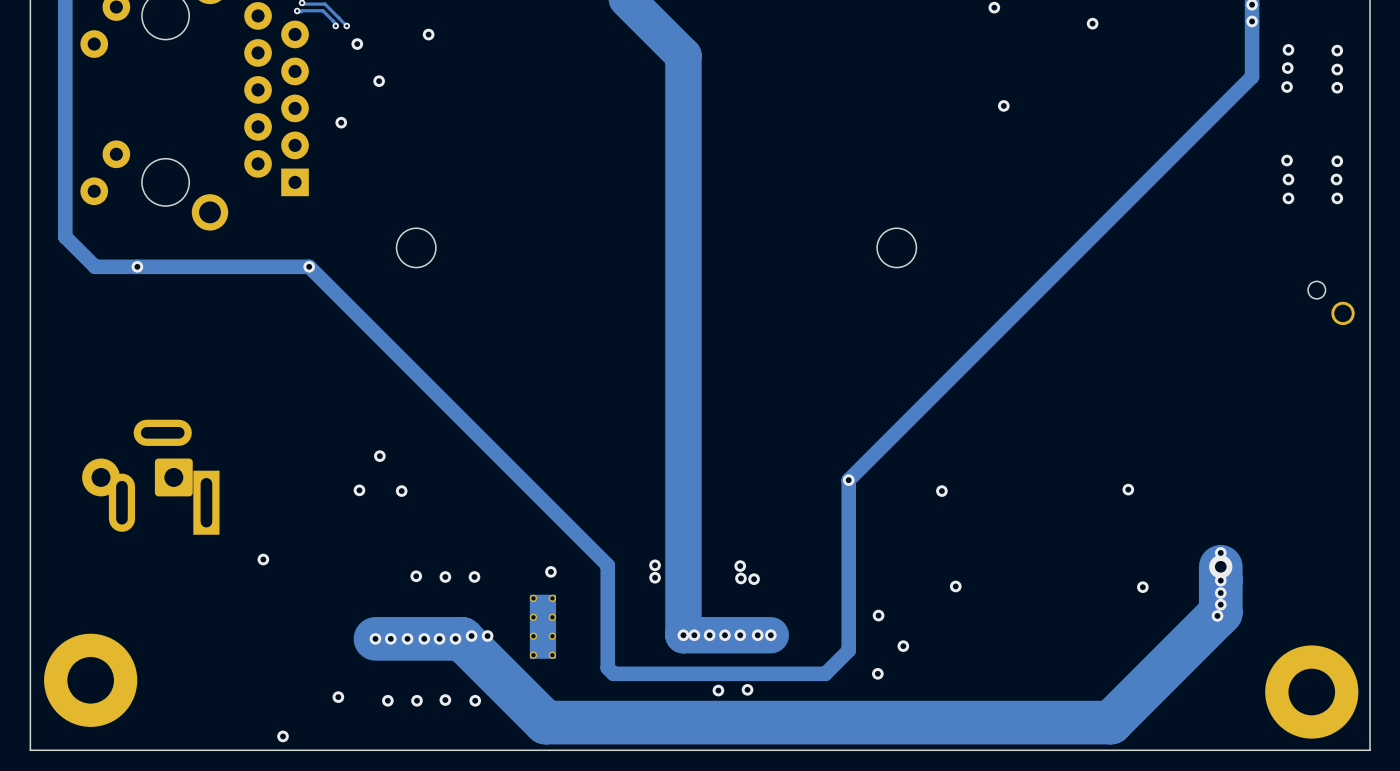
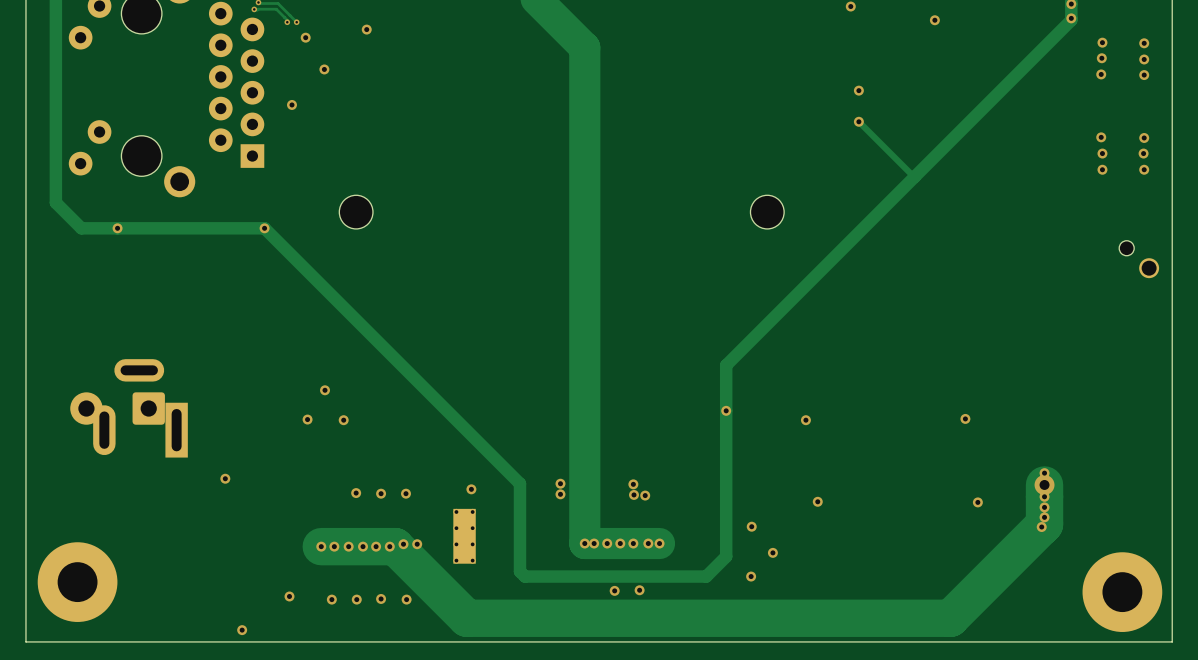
track: (1252, 23) (1252, 76) (848, 480) -> (1071, 20) (726, 365) (726, 410)
track: none -> (858, 121) (914, 176)
via: none -> (858, 121)

